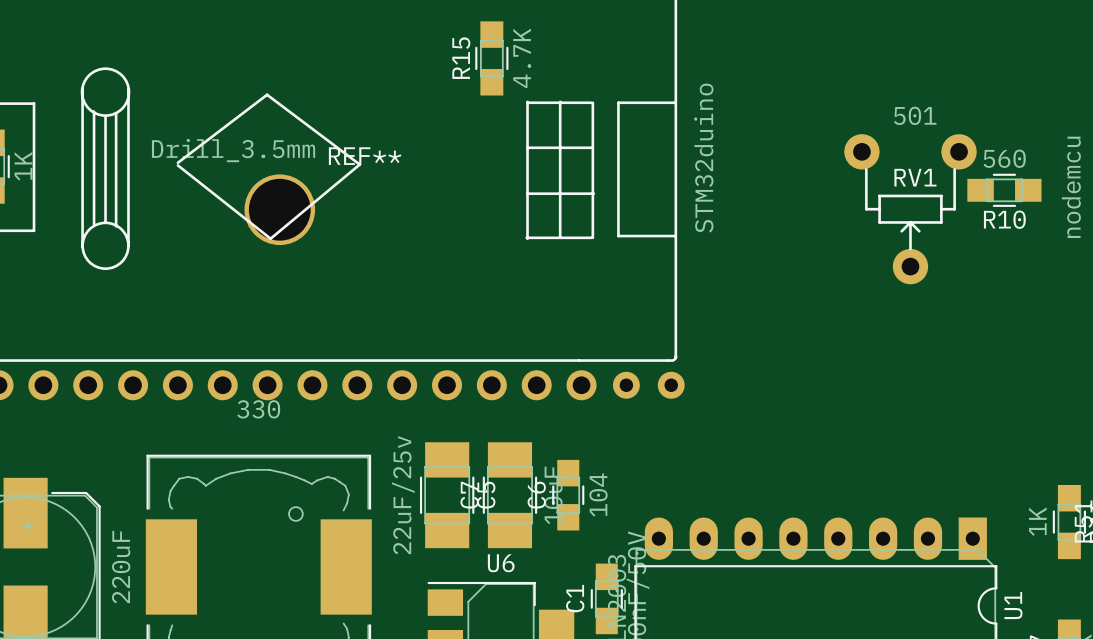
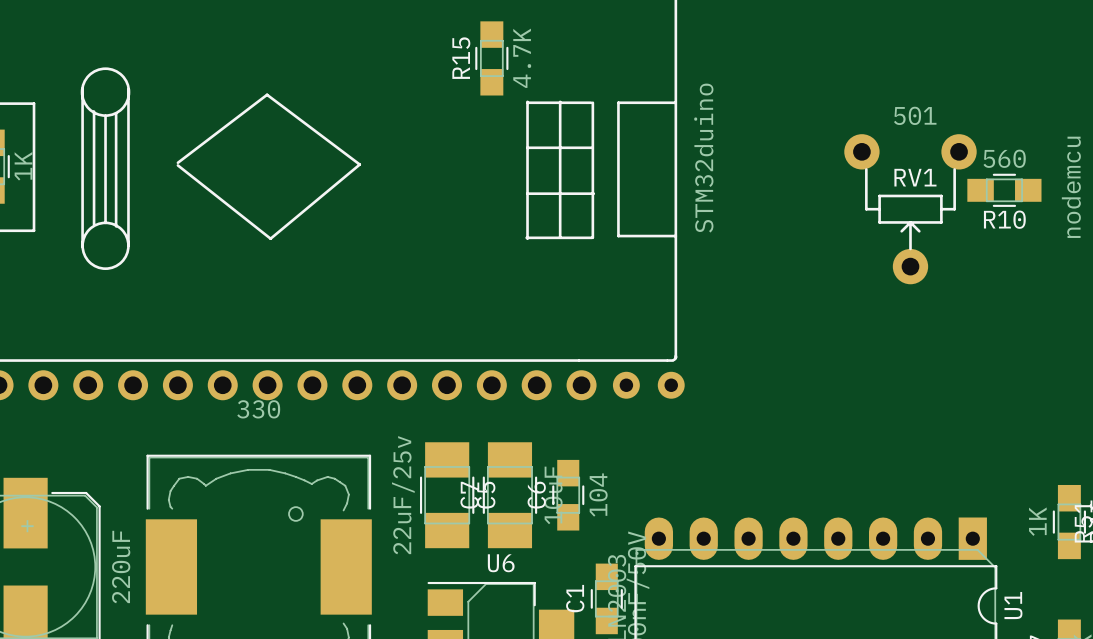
REF**: Drill_3.5mm (279, 209) -> none

